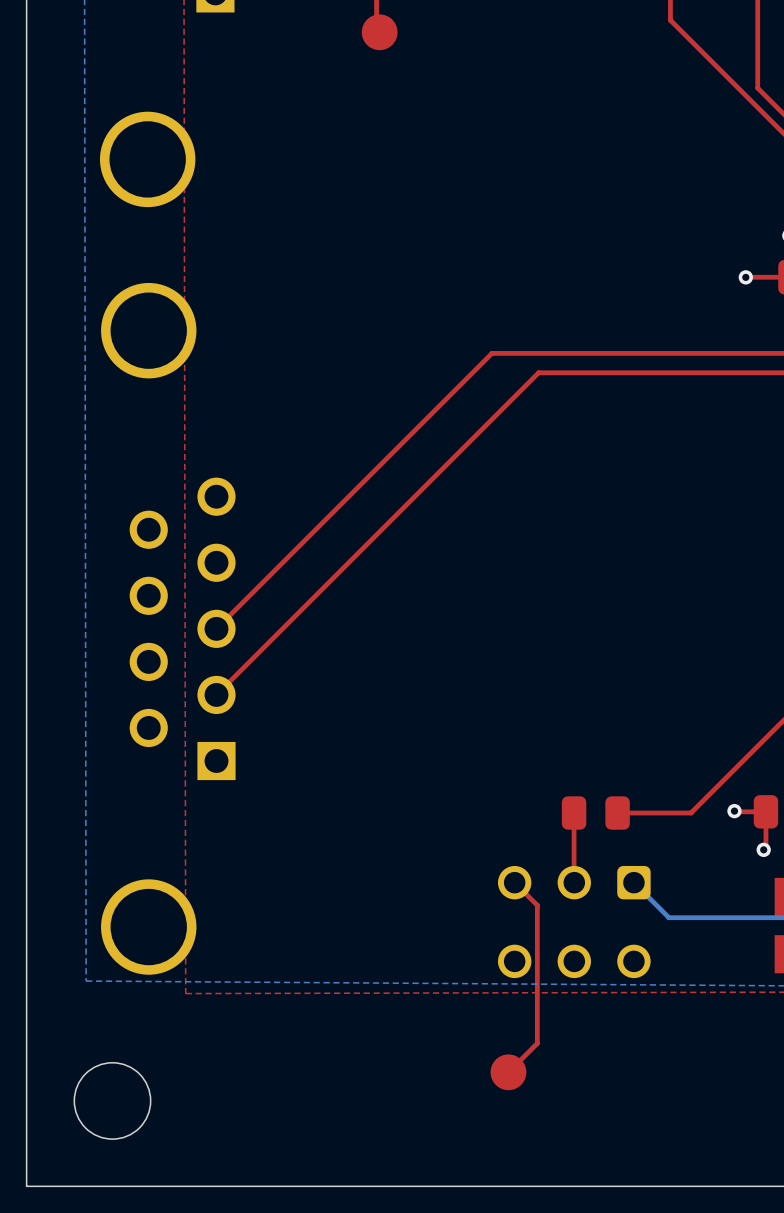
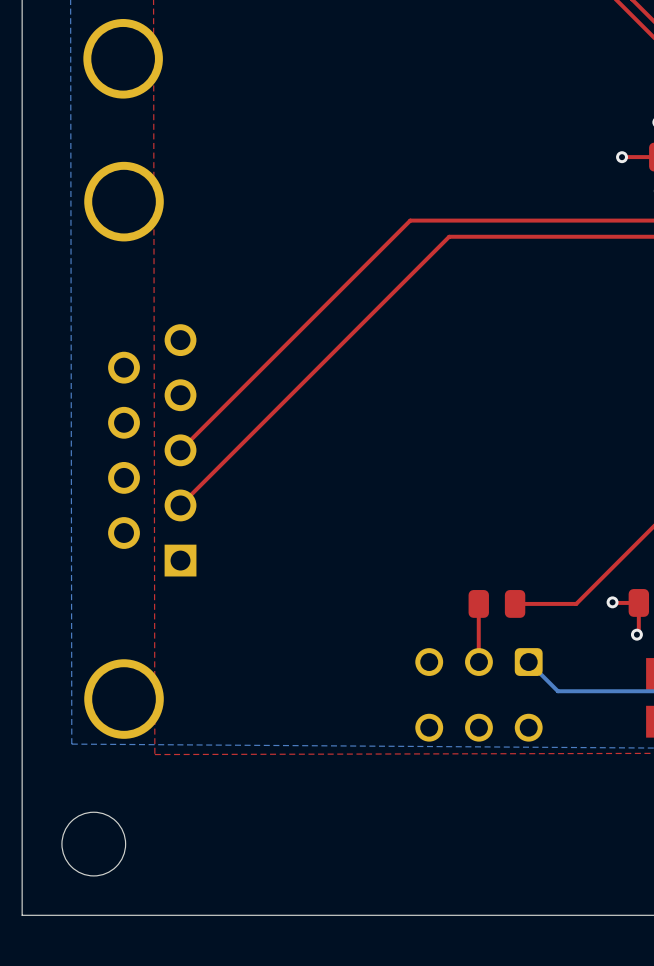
top track: (514, 882) (537, 905) (537, 1043) (508, 1072) -> none
part: (508, 1072) -> none

